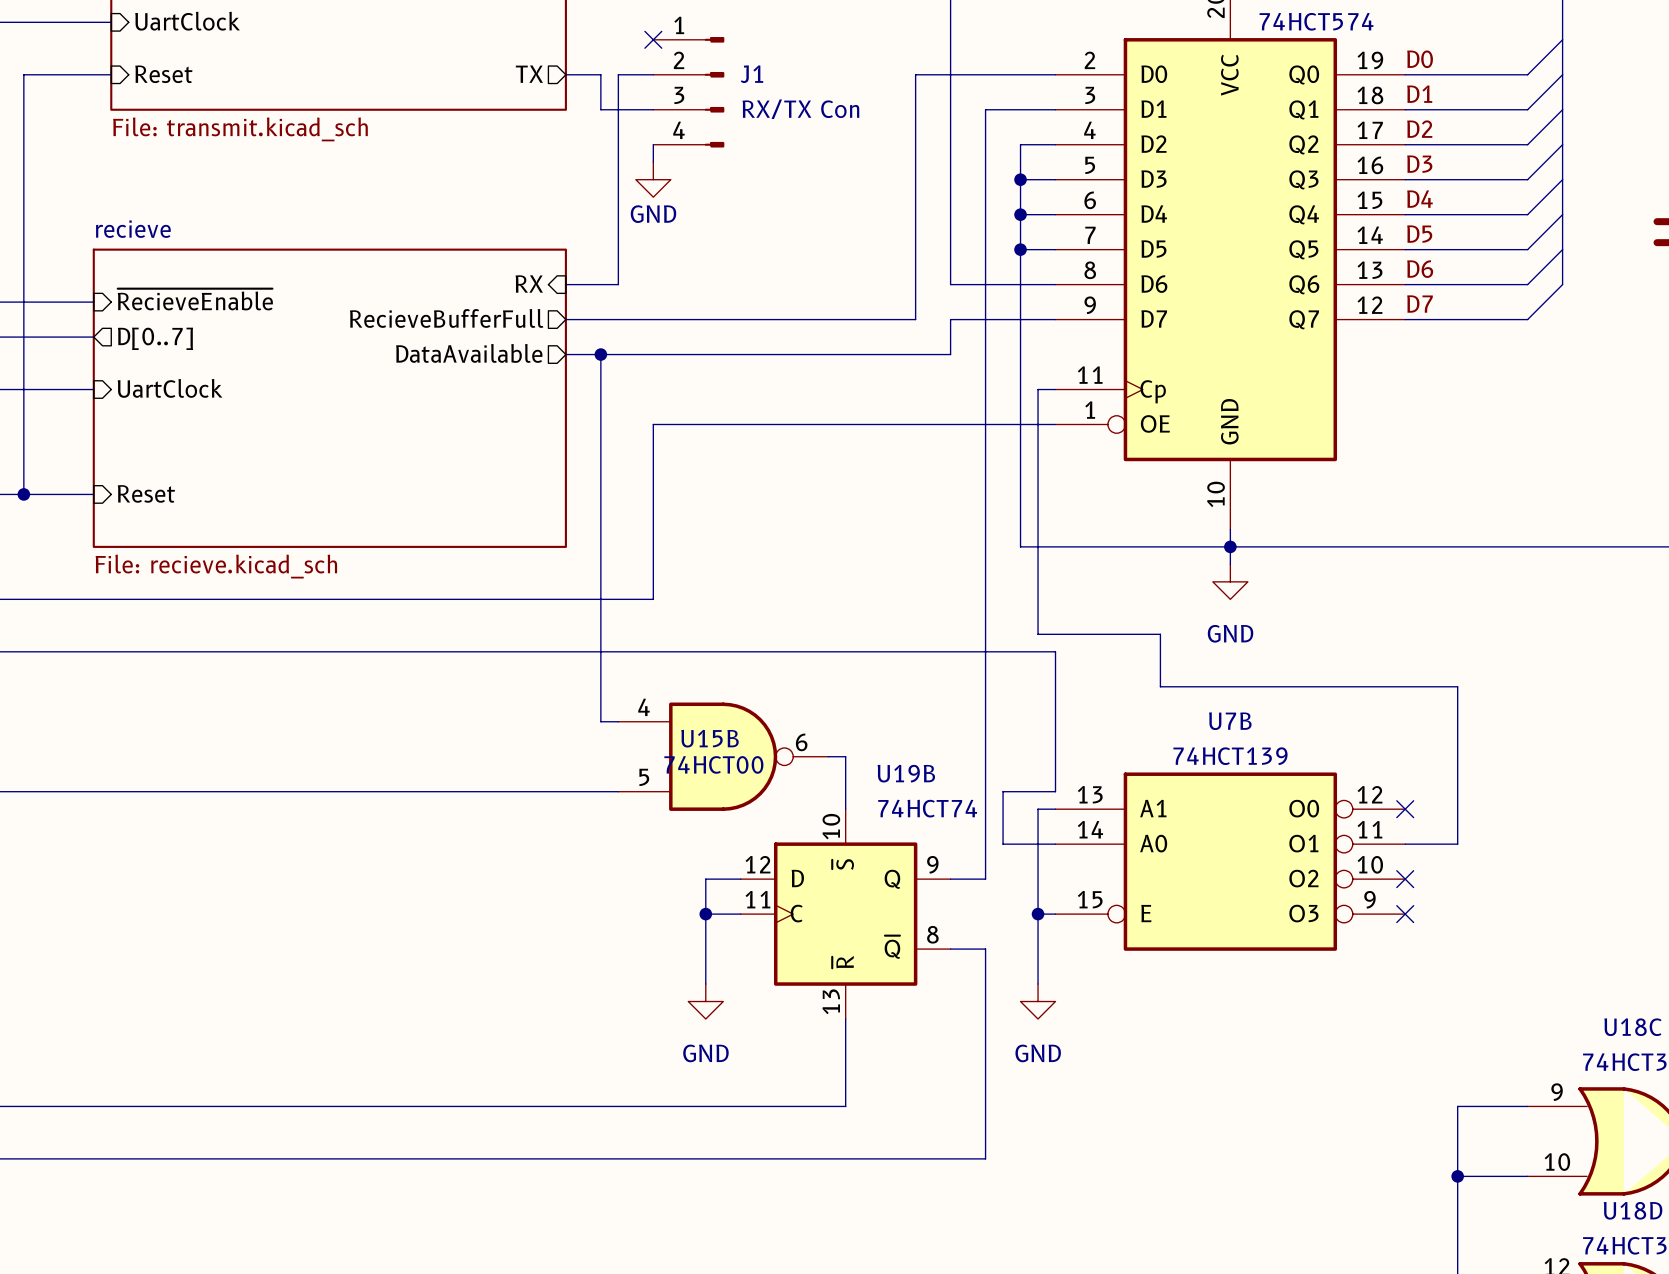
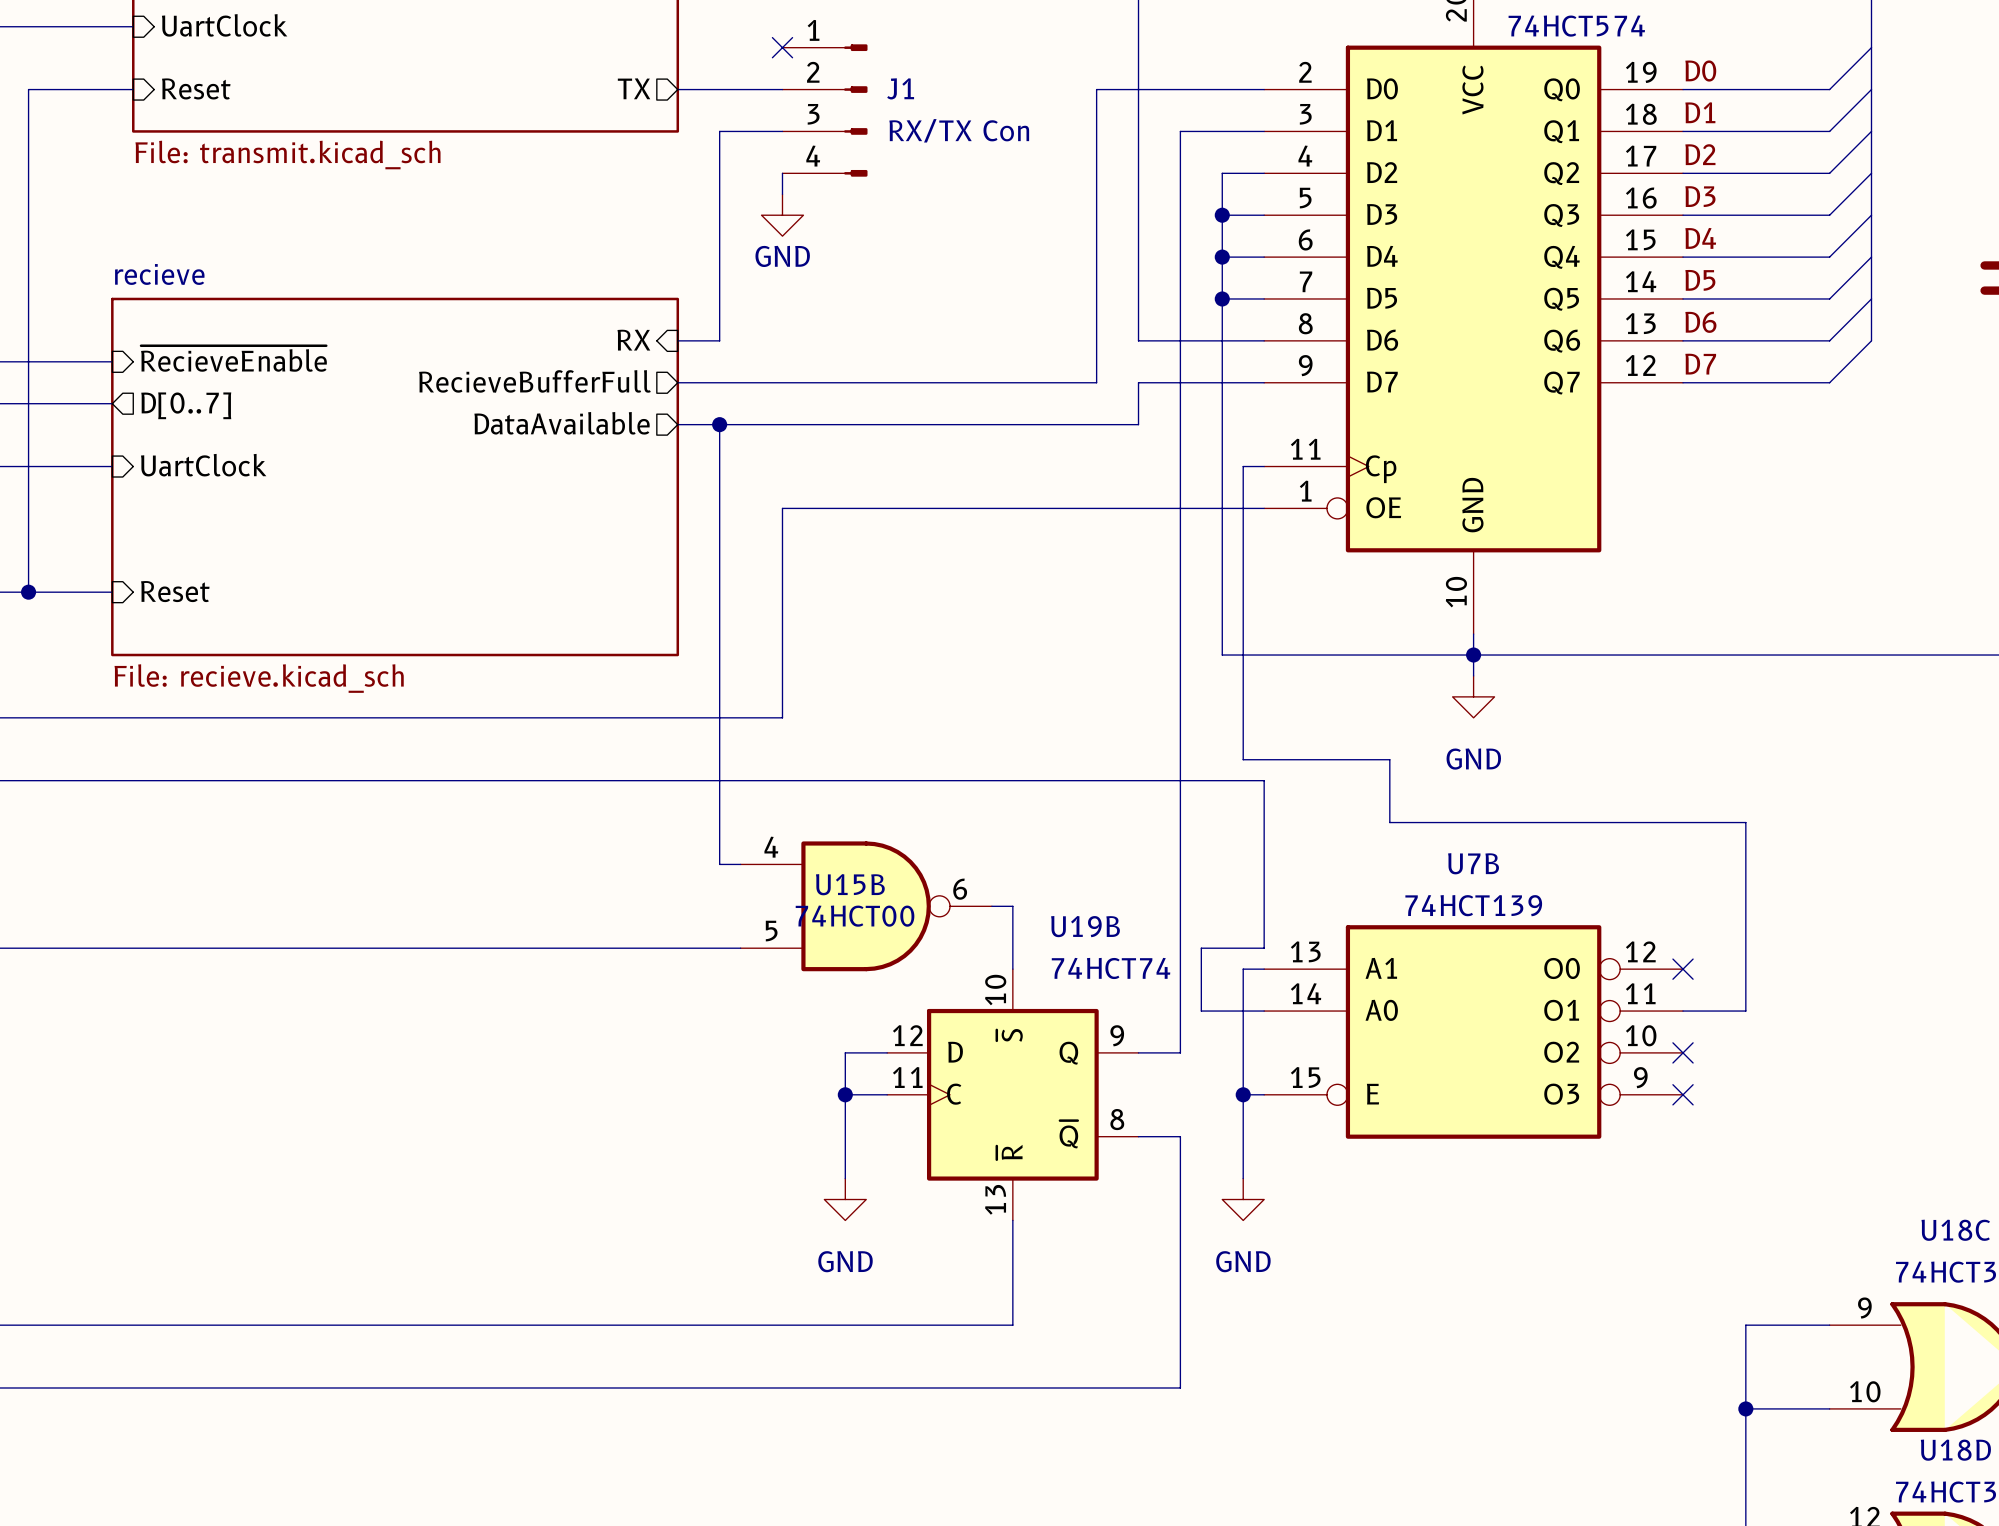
wire: (600, 74) (600, 109) -> (719, 89) (740, 89)
wire: (618, 74) (618, 284) (600, 284) -> (719, 131) (719, 340)

